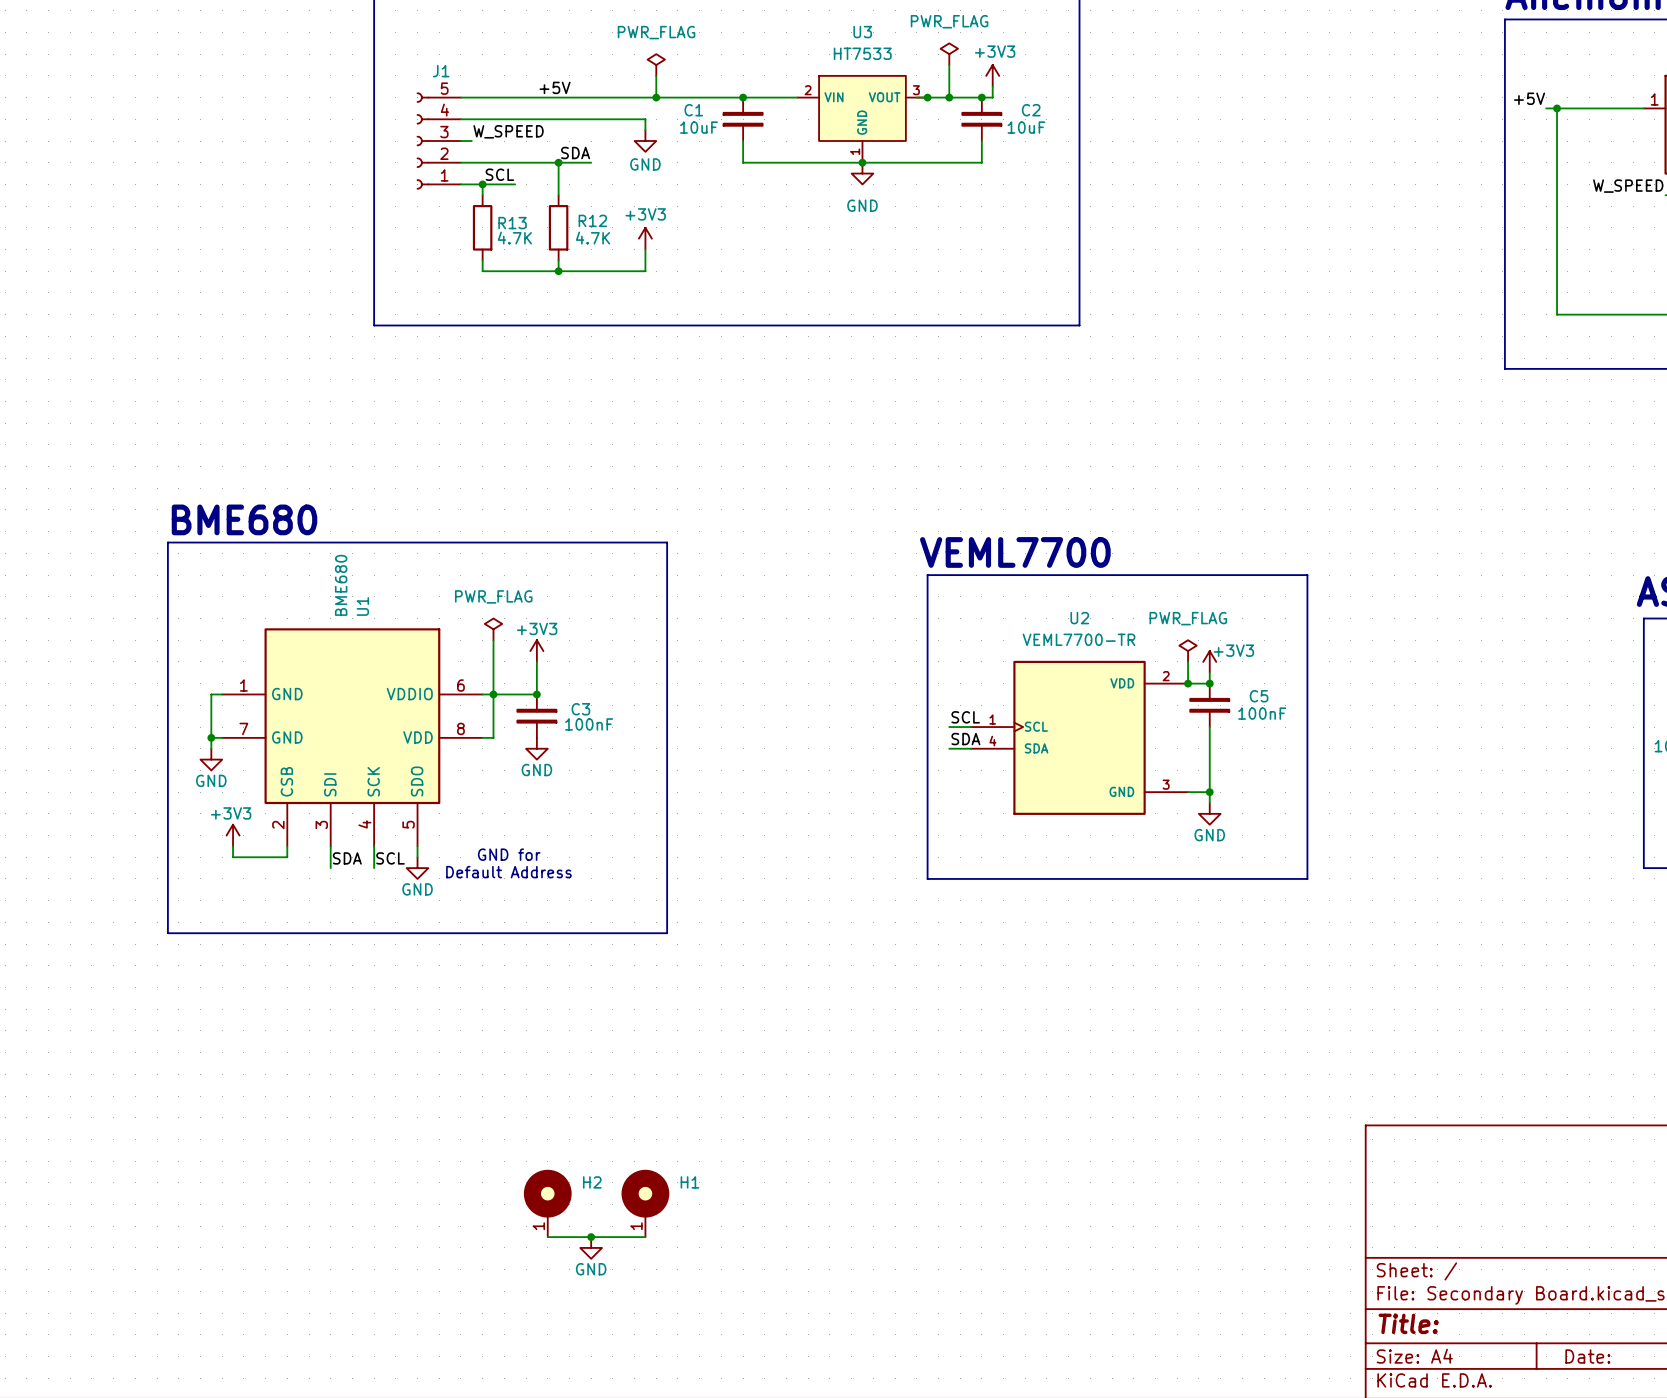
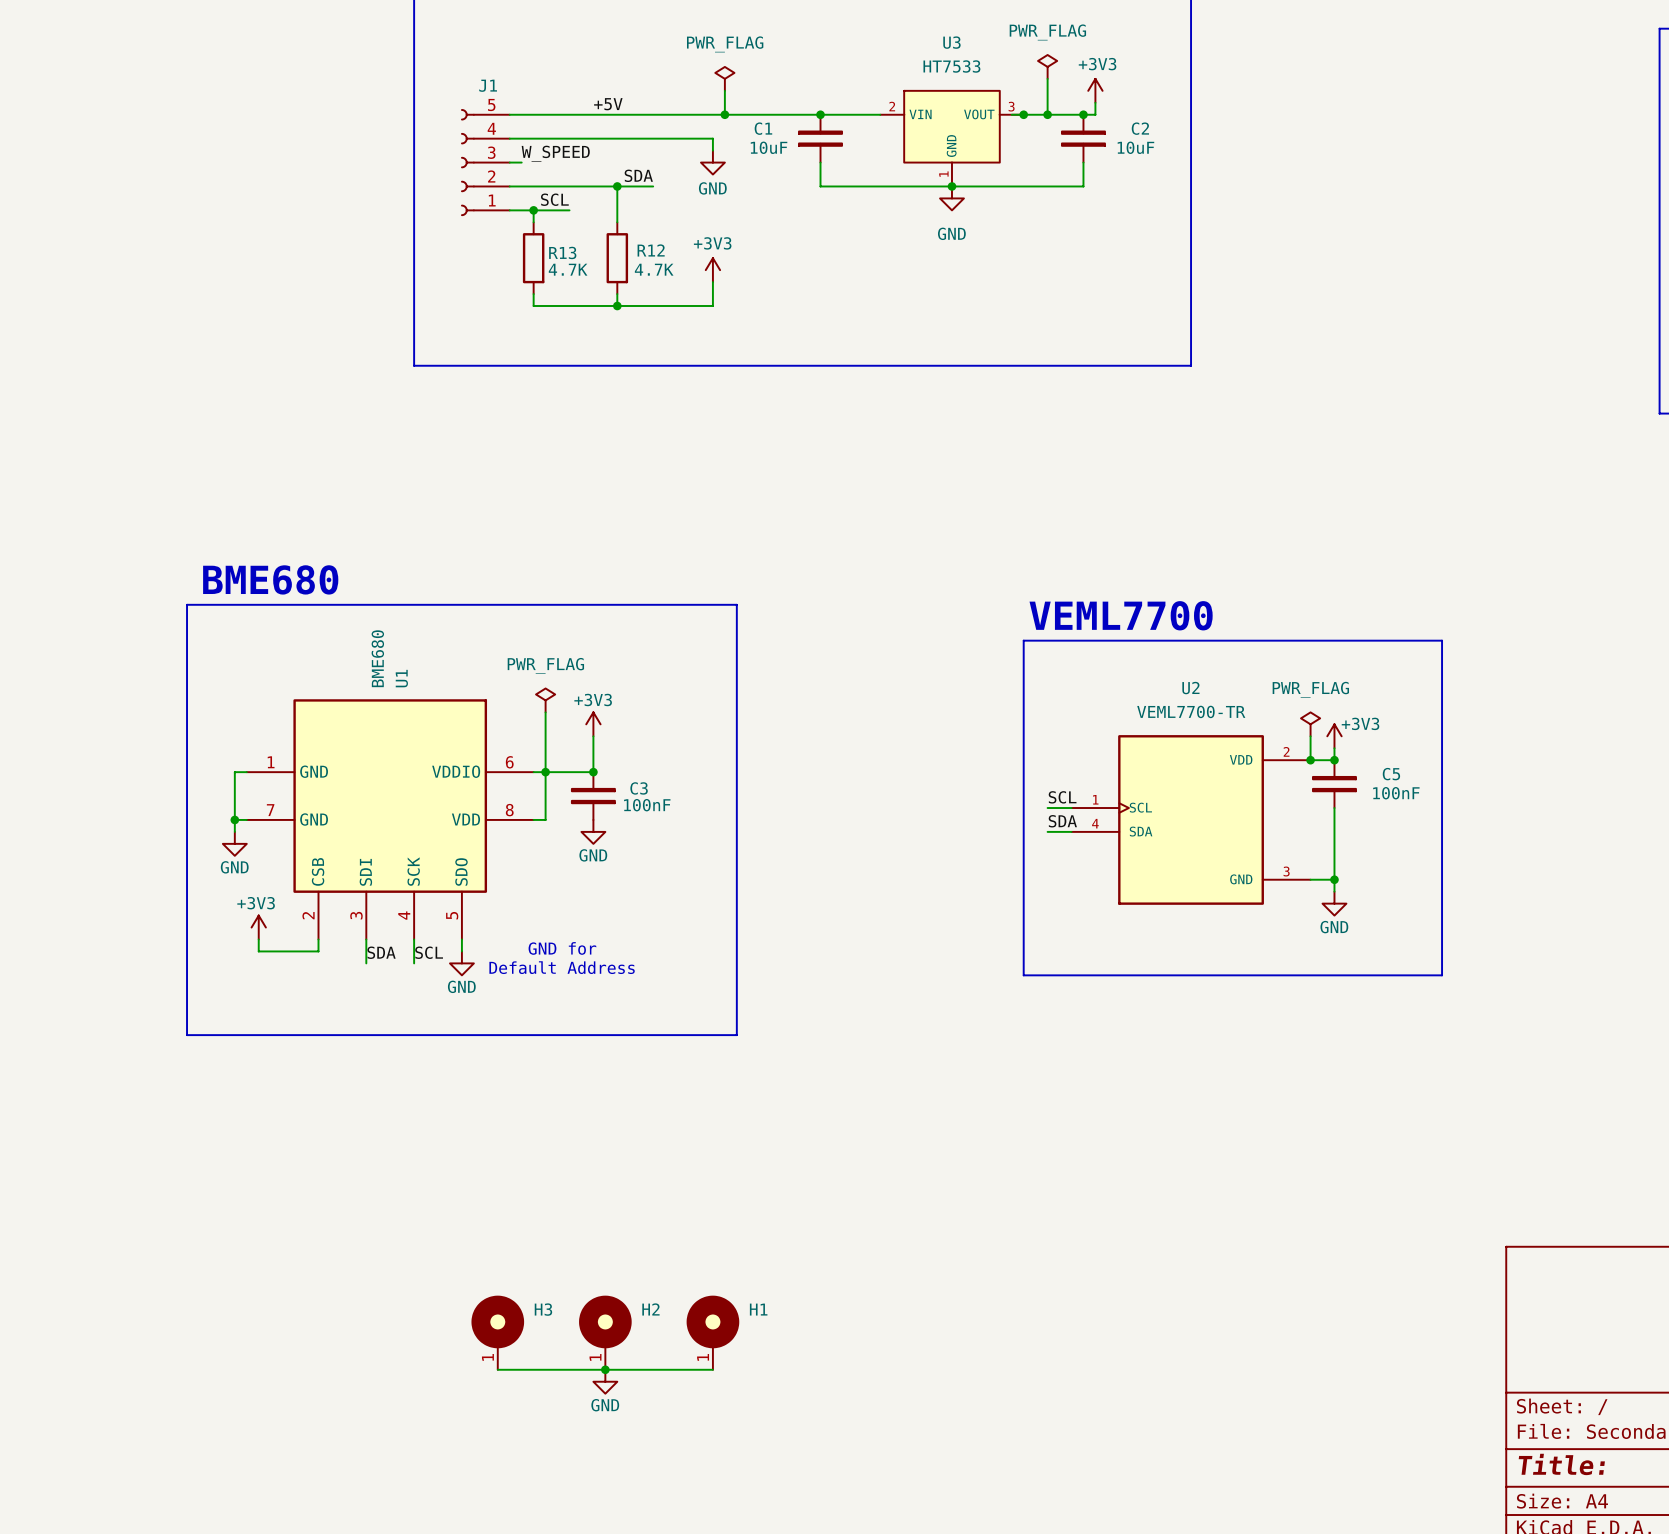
H3: none -> (497, 1332)
wire: none -> (497, 1369) (605, 1369)
junction position: (591, 1237) -> (605, 1369)
power symbol position: GND (591, 1247) -> GND (605, 1381)

